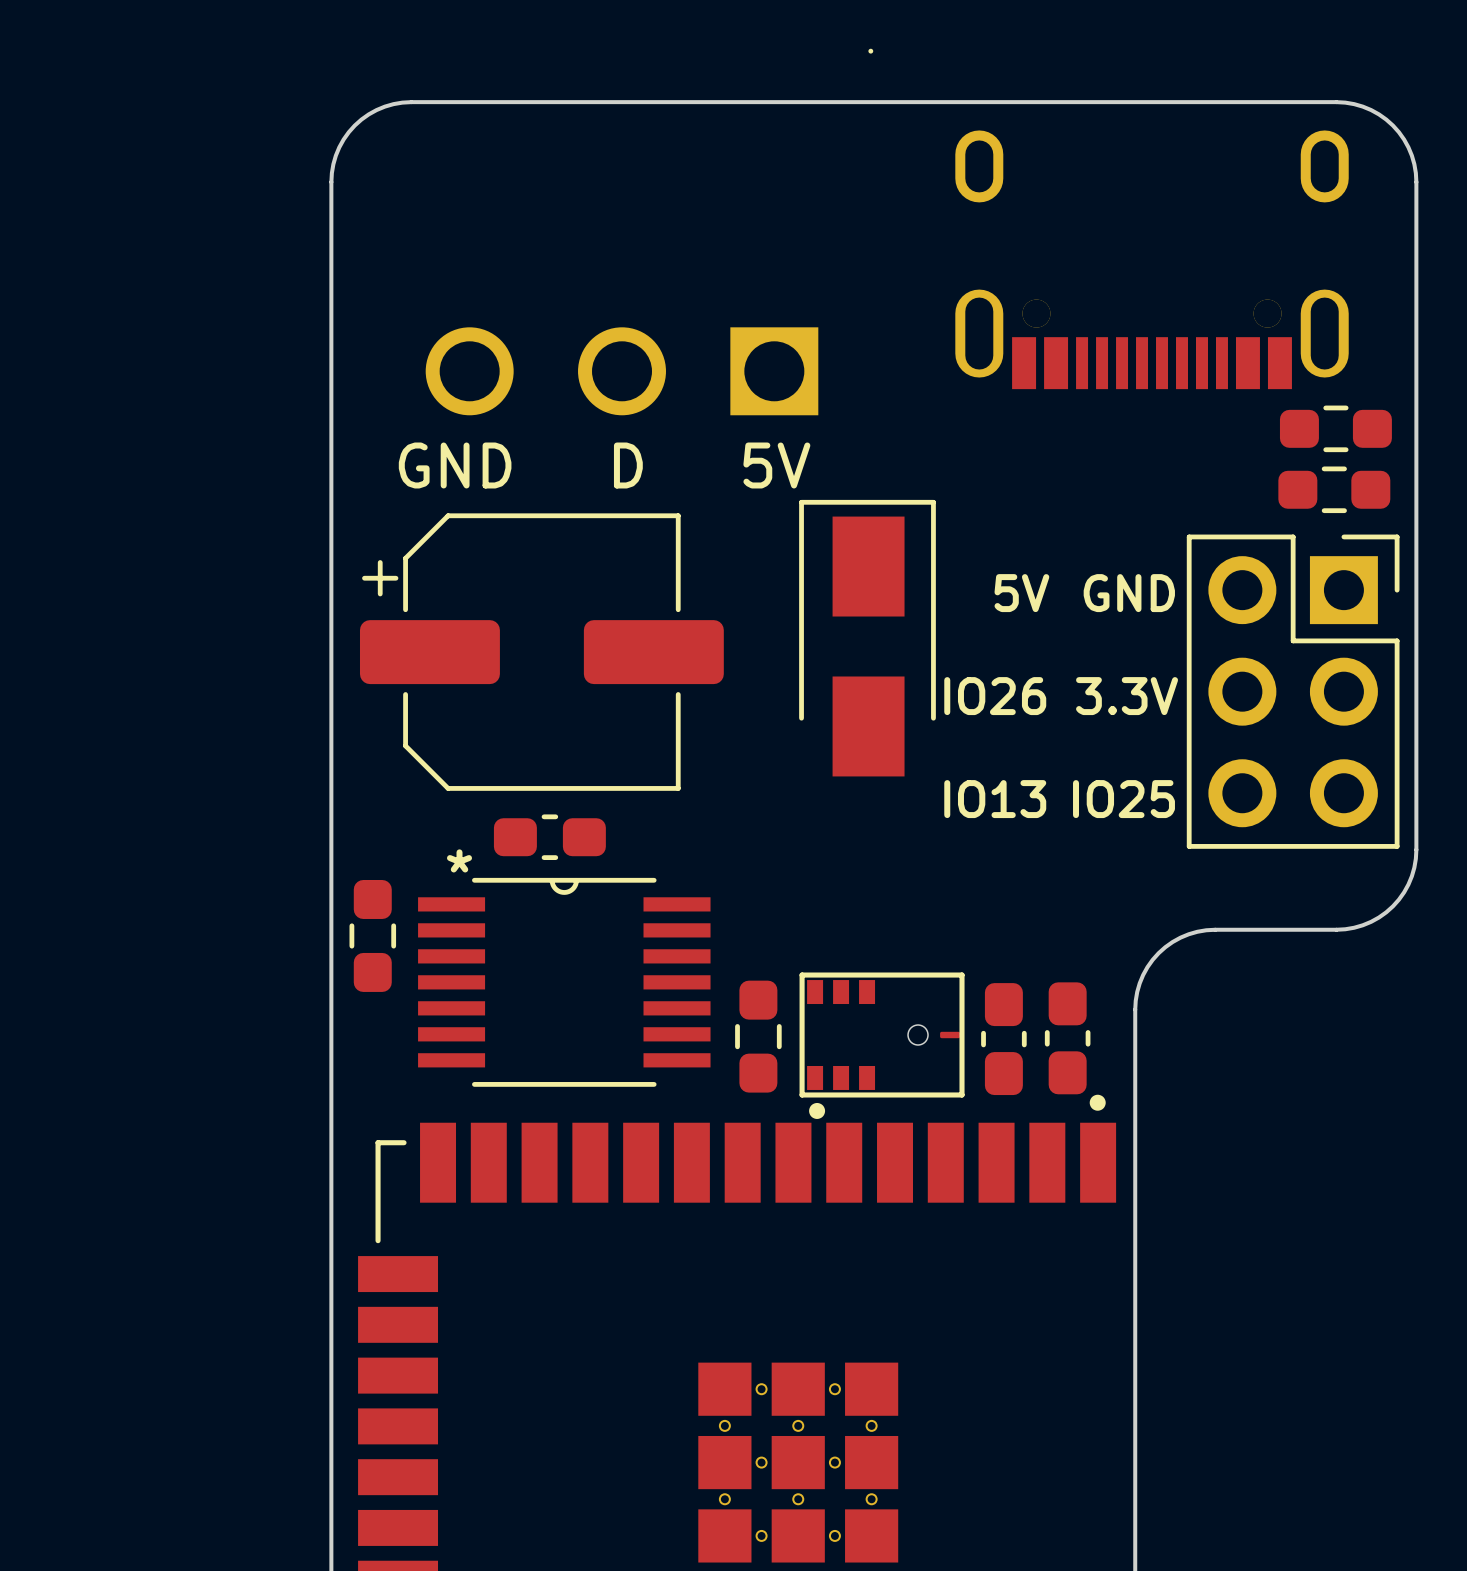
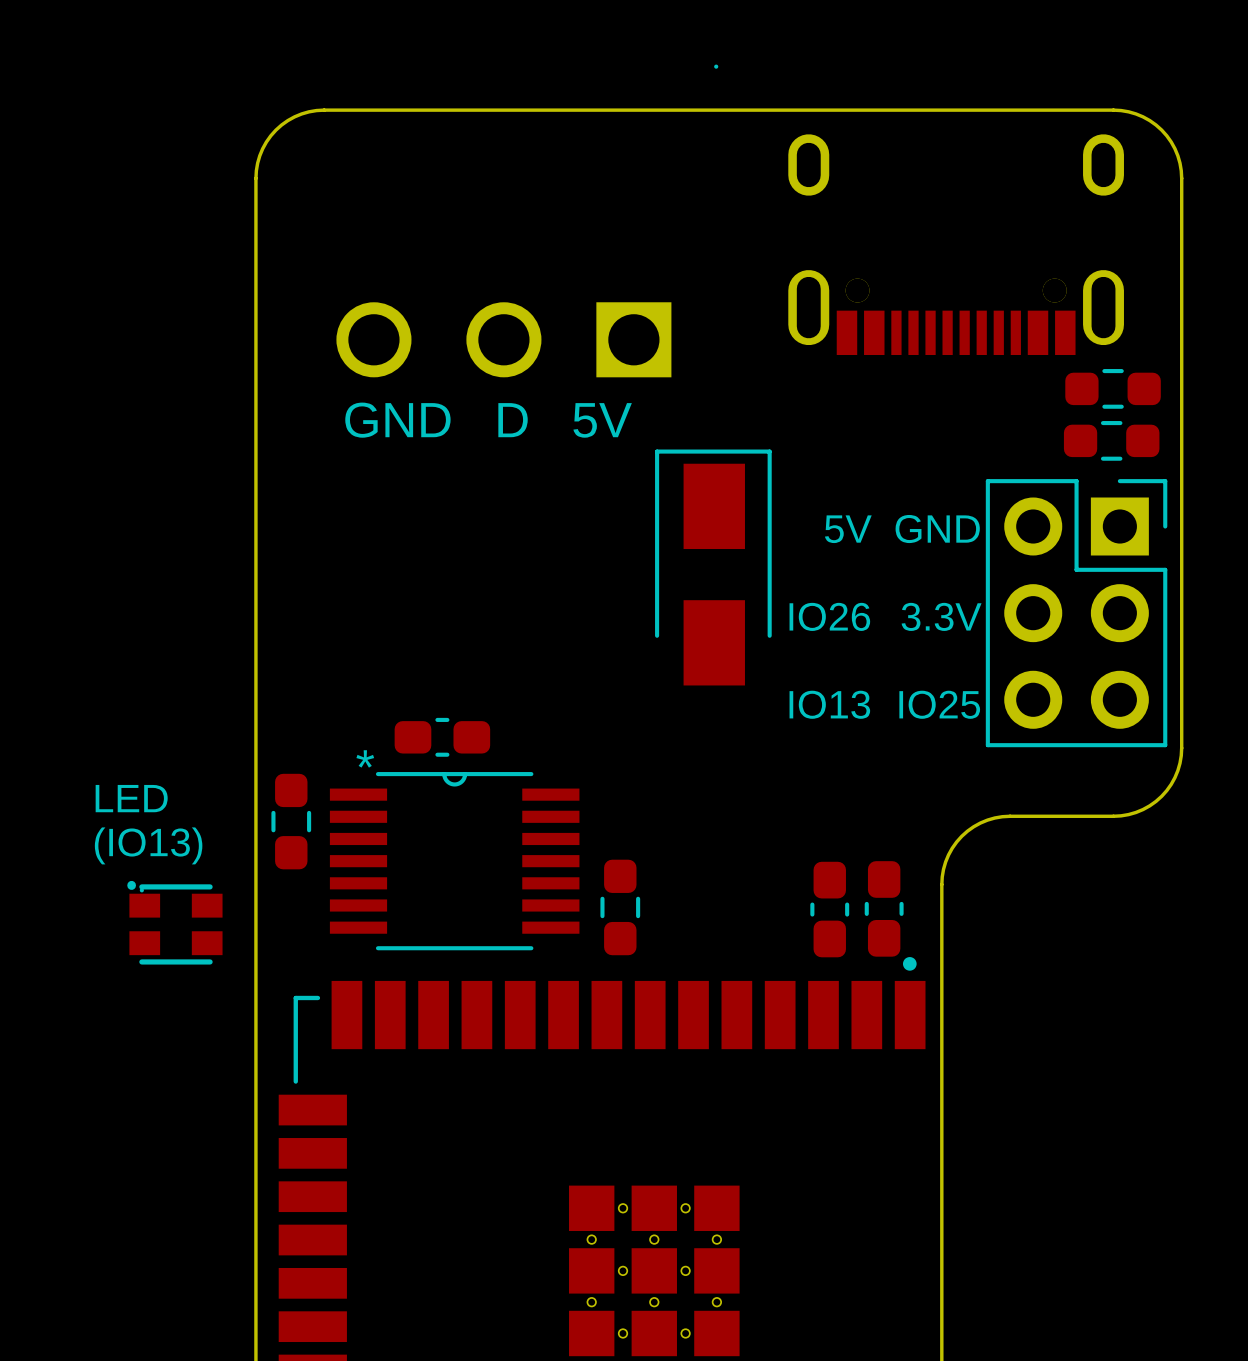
part: (541, 652) -> none
text: none -> LED (131, 798)
text: none -> (IO13) (148, 845)
part: (882, 1045) -> none
part: none -> (174, 922)

